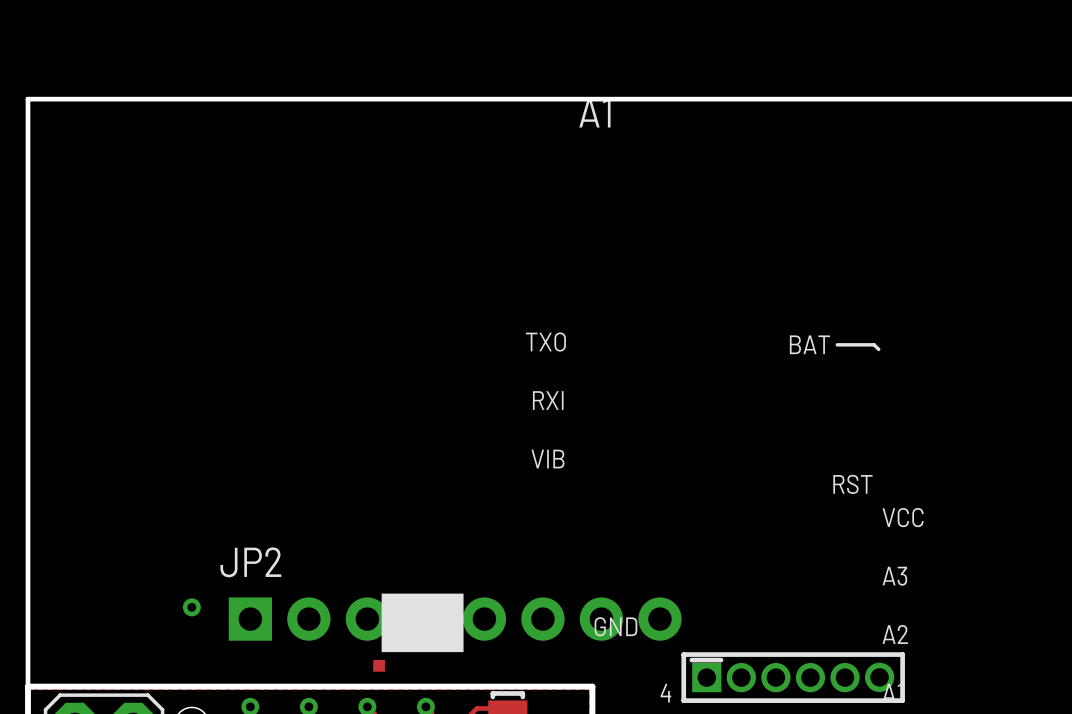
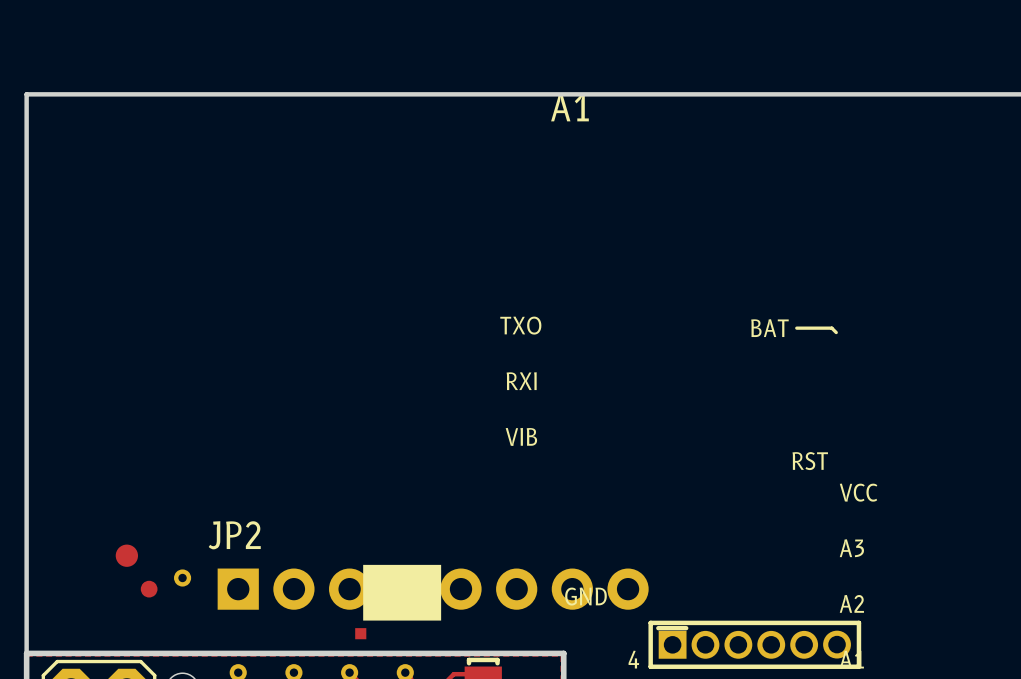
part: none -> (126, 555)
part: none -> (149, 589)

